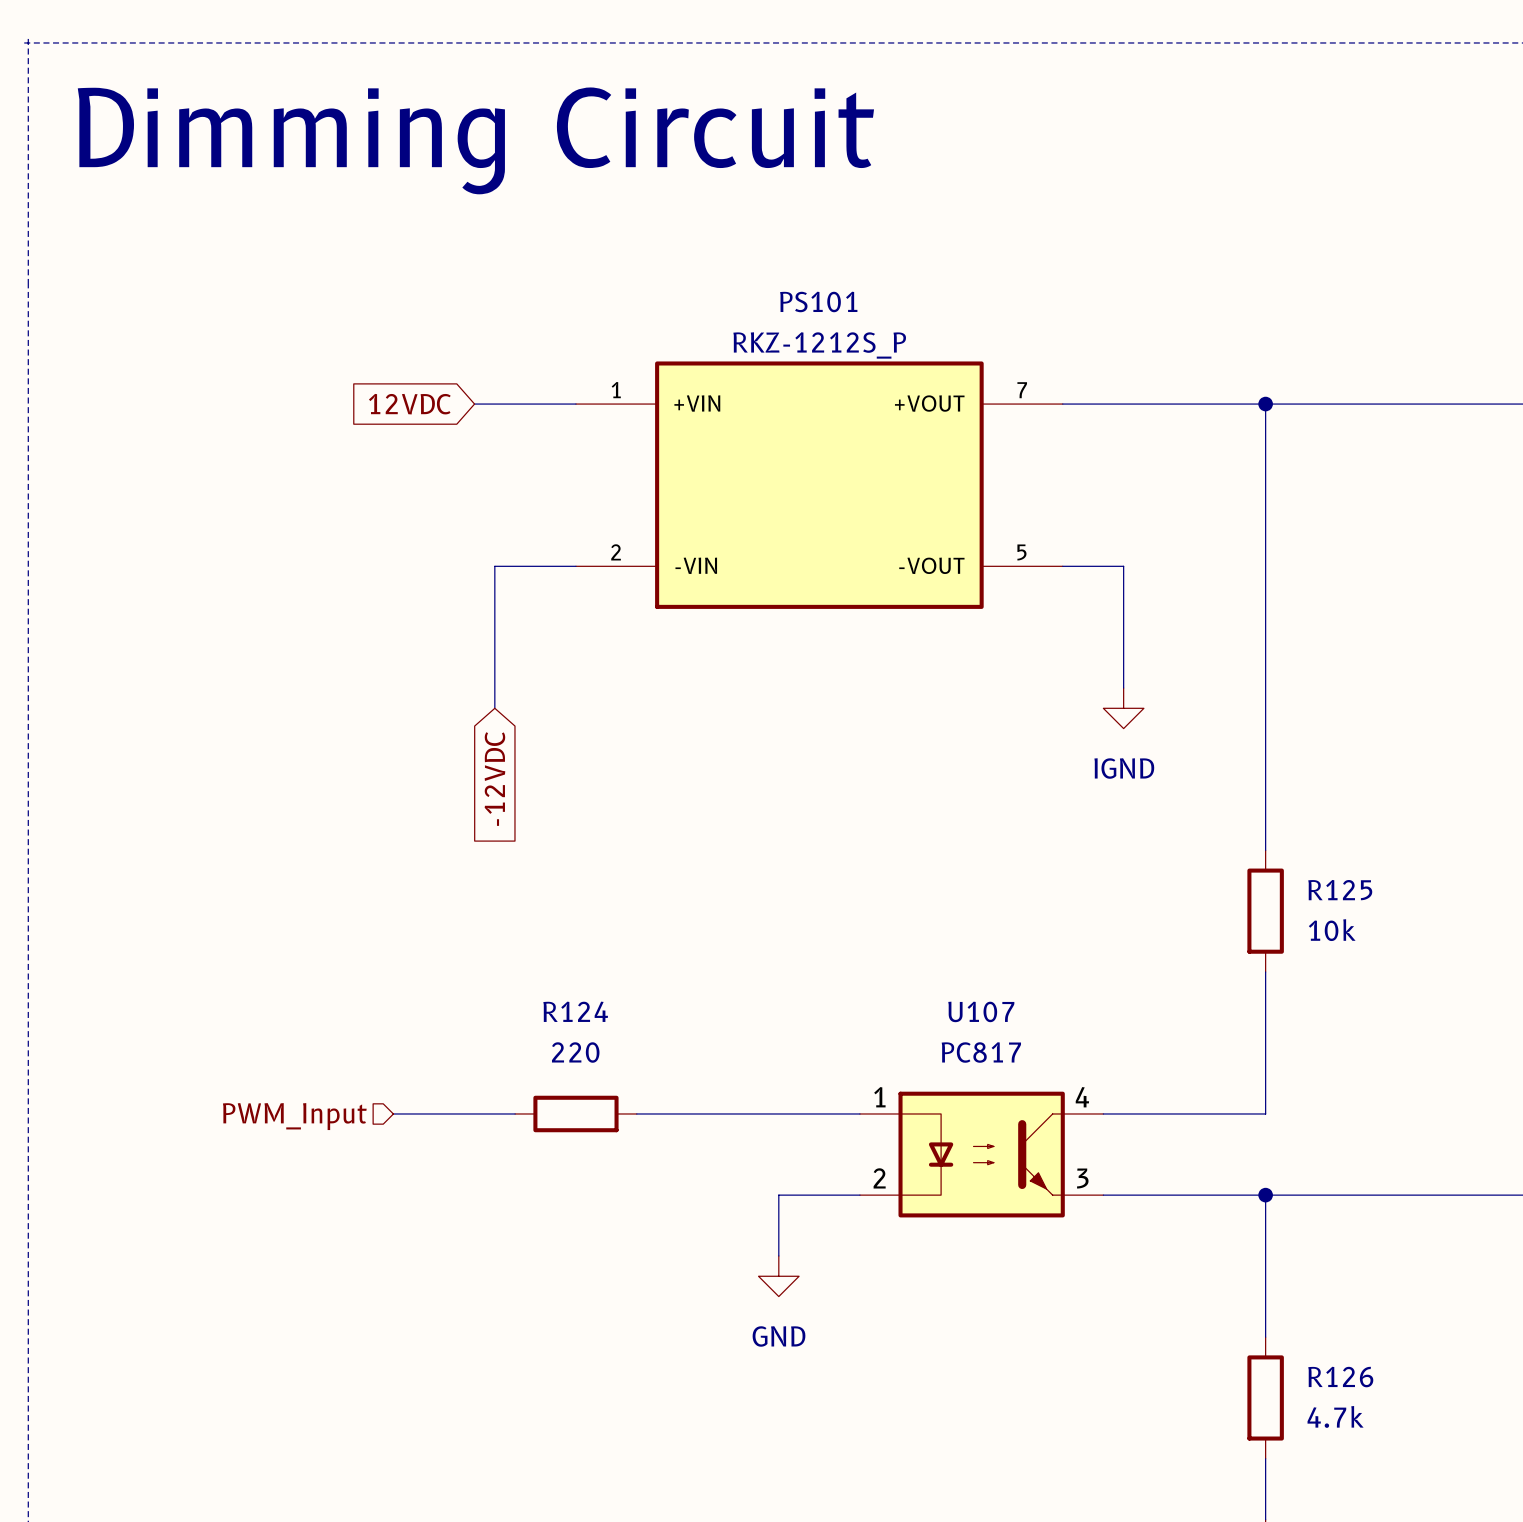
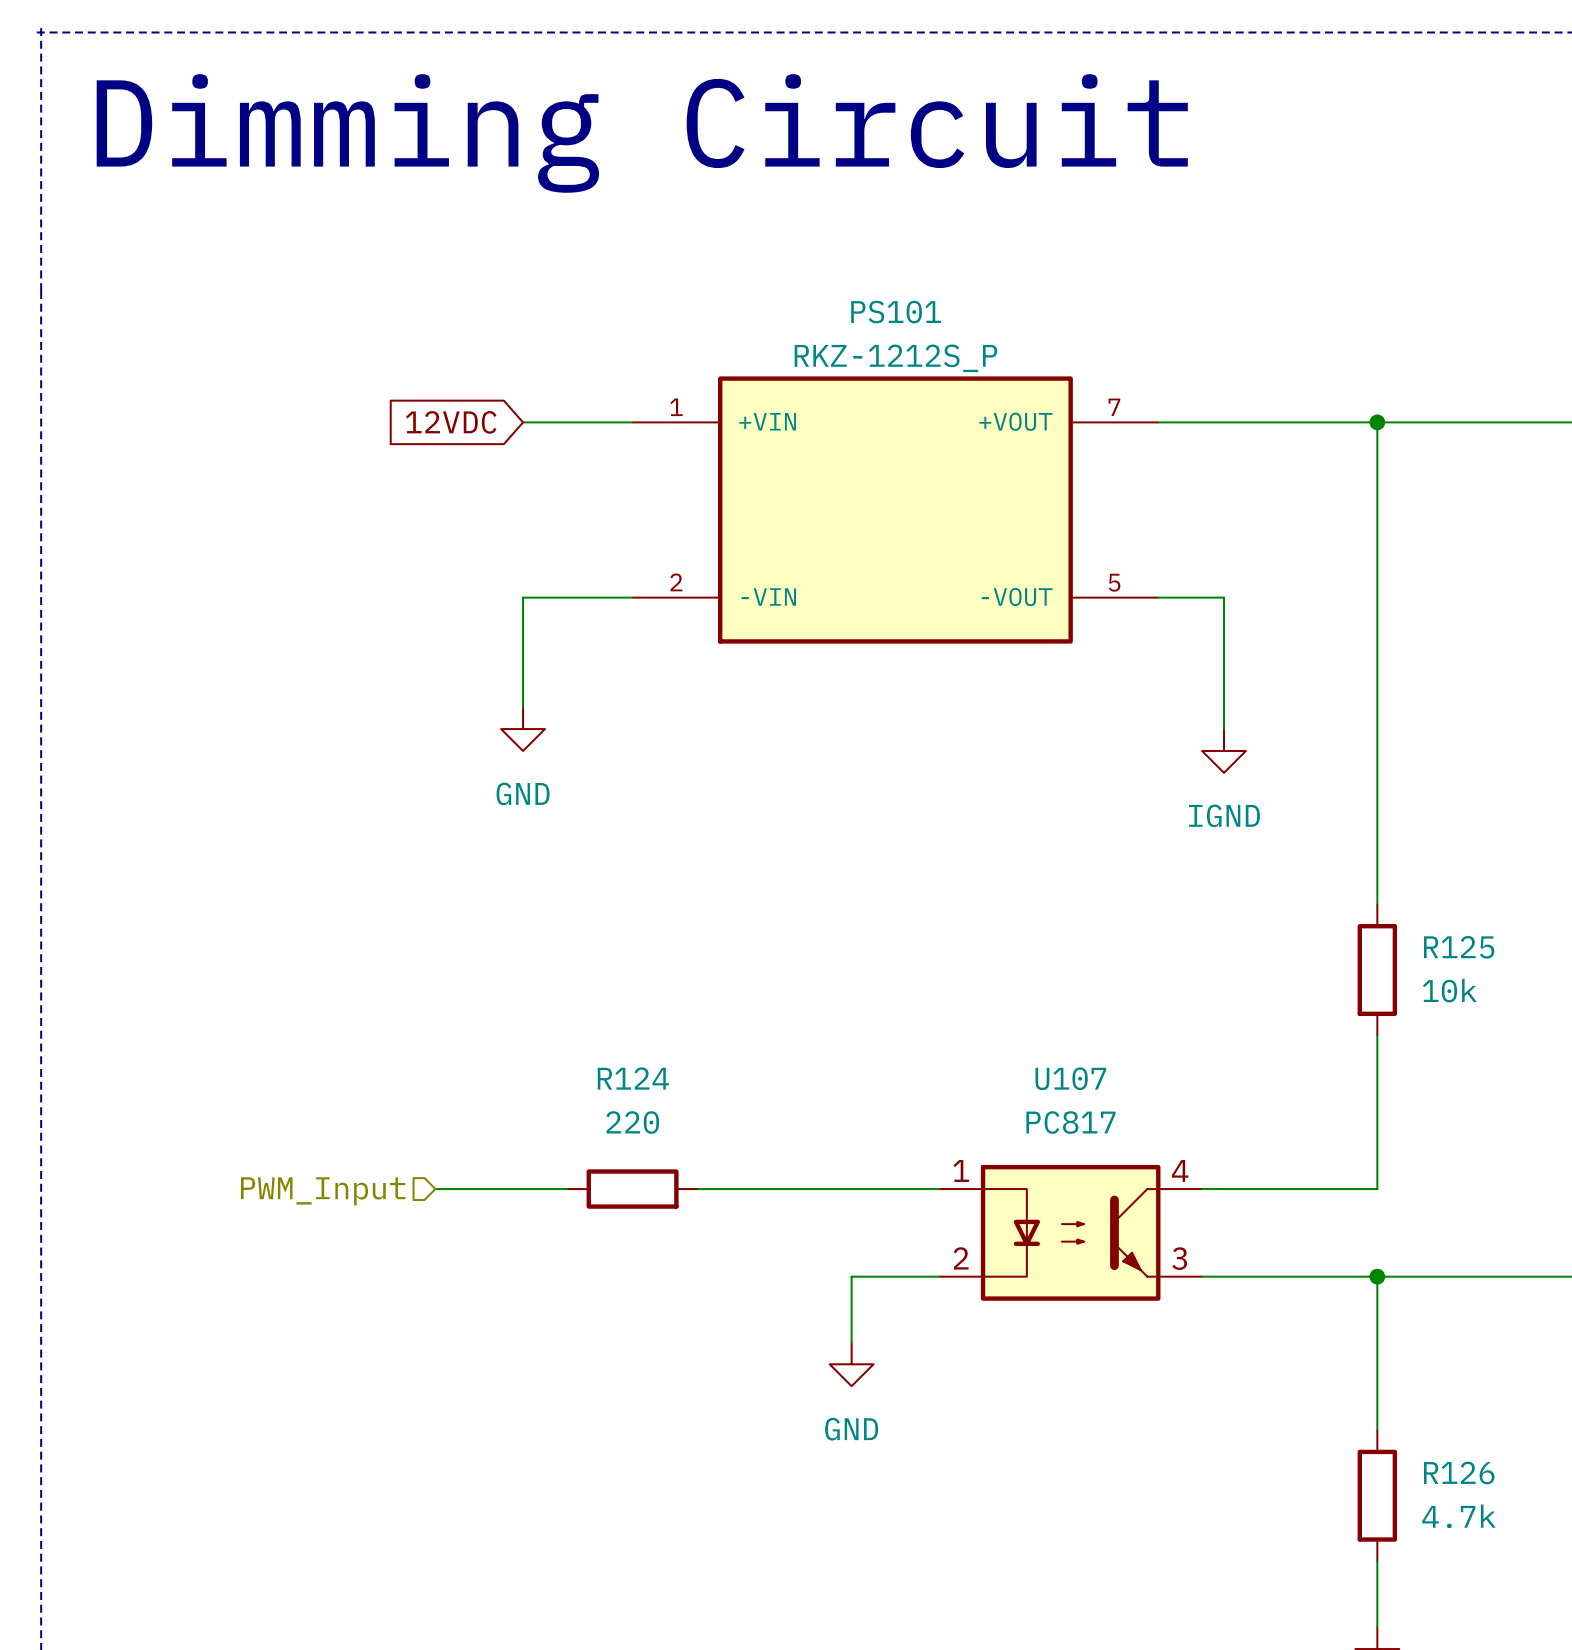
wire: (494, 566) (494, 708) -> (544, 597) (523, 597) (523, 707)
power symbol: none -> GND (523, 729)
global label: -12VDC (494, 779) -> none

